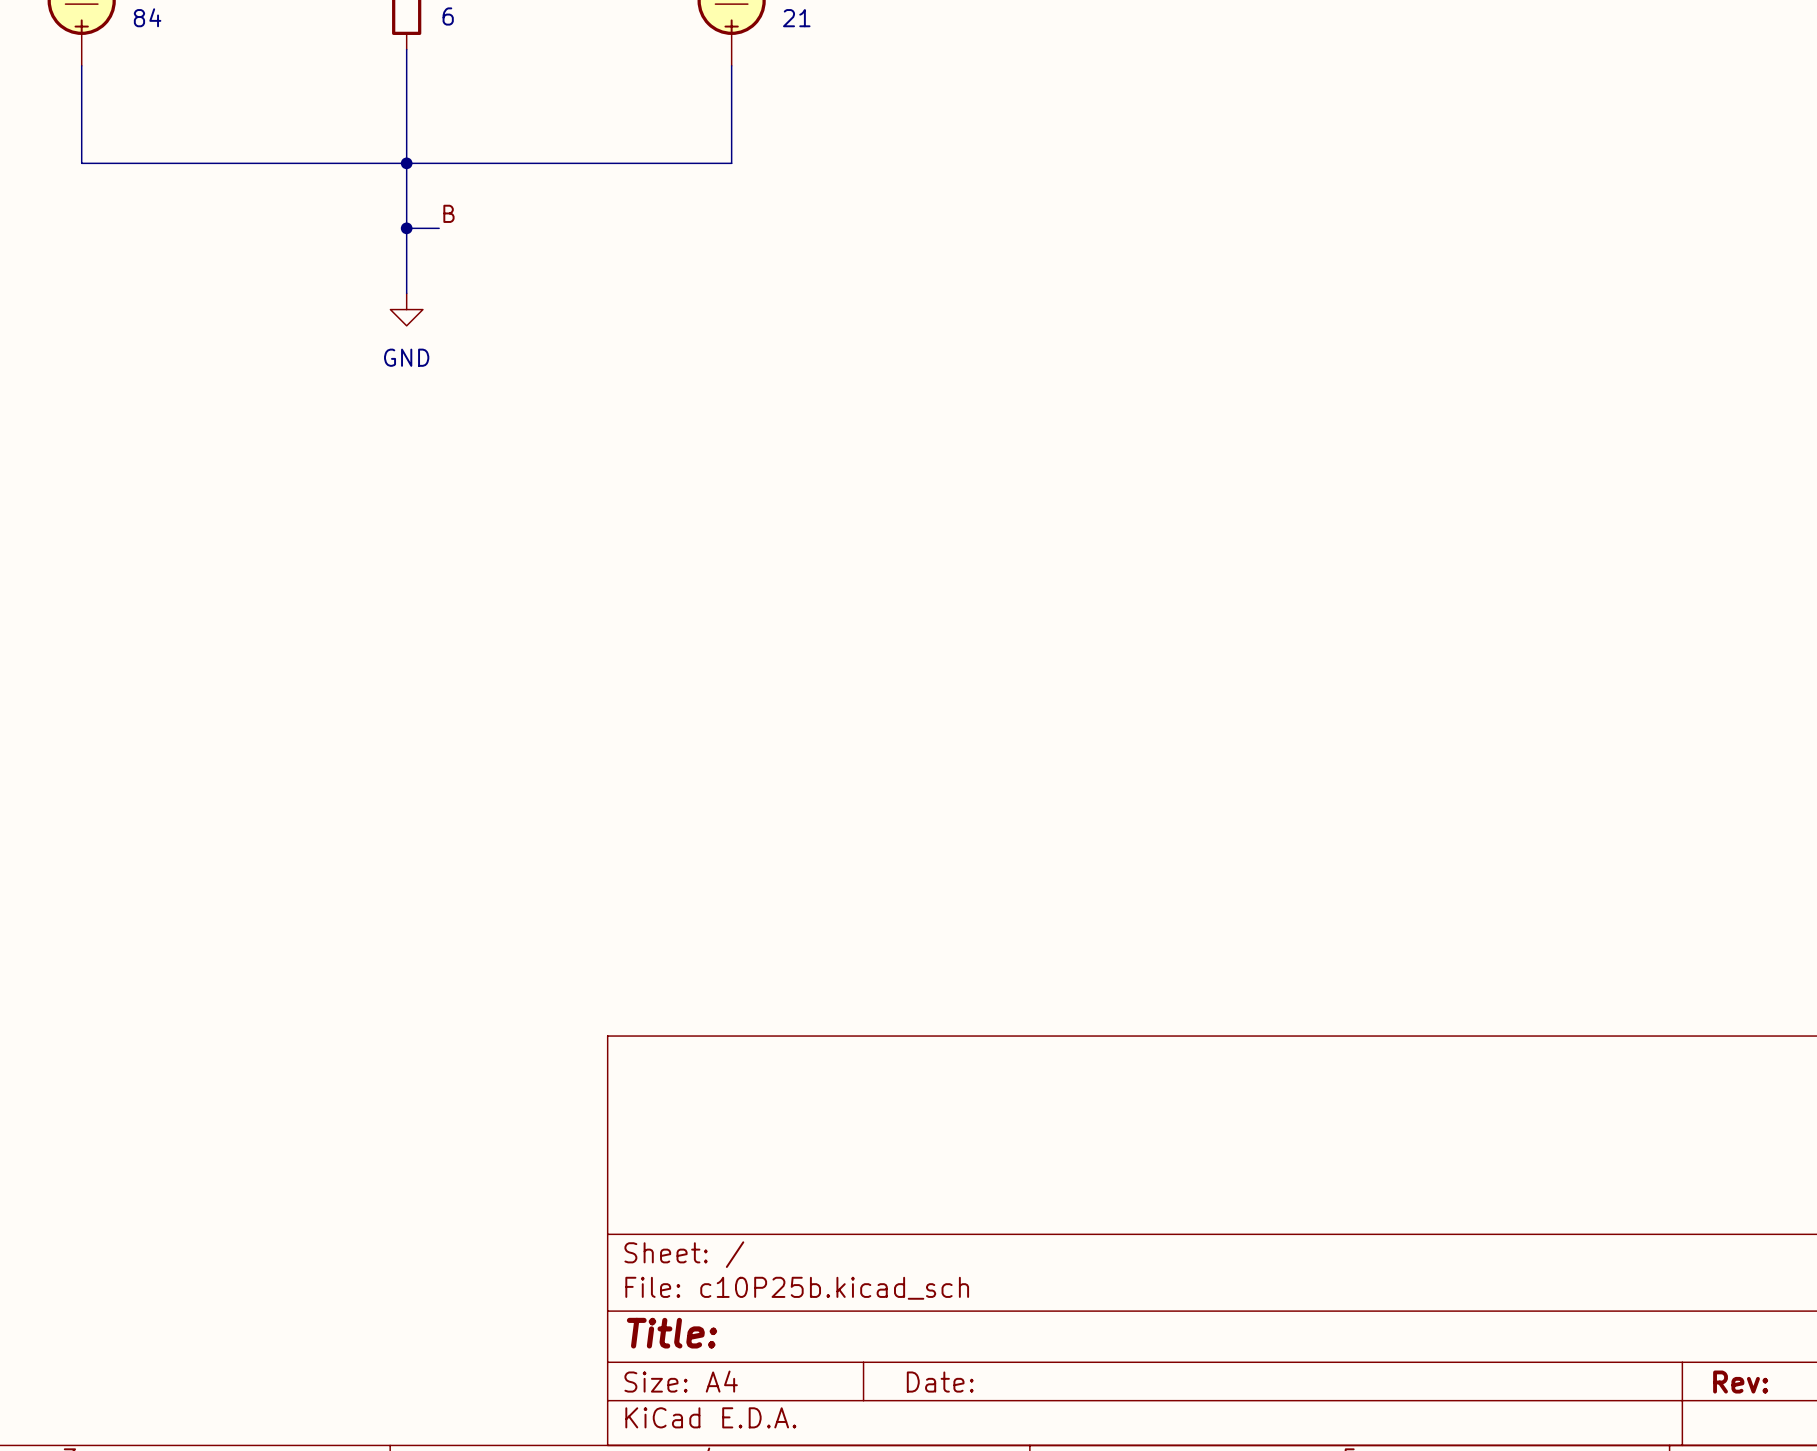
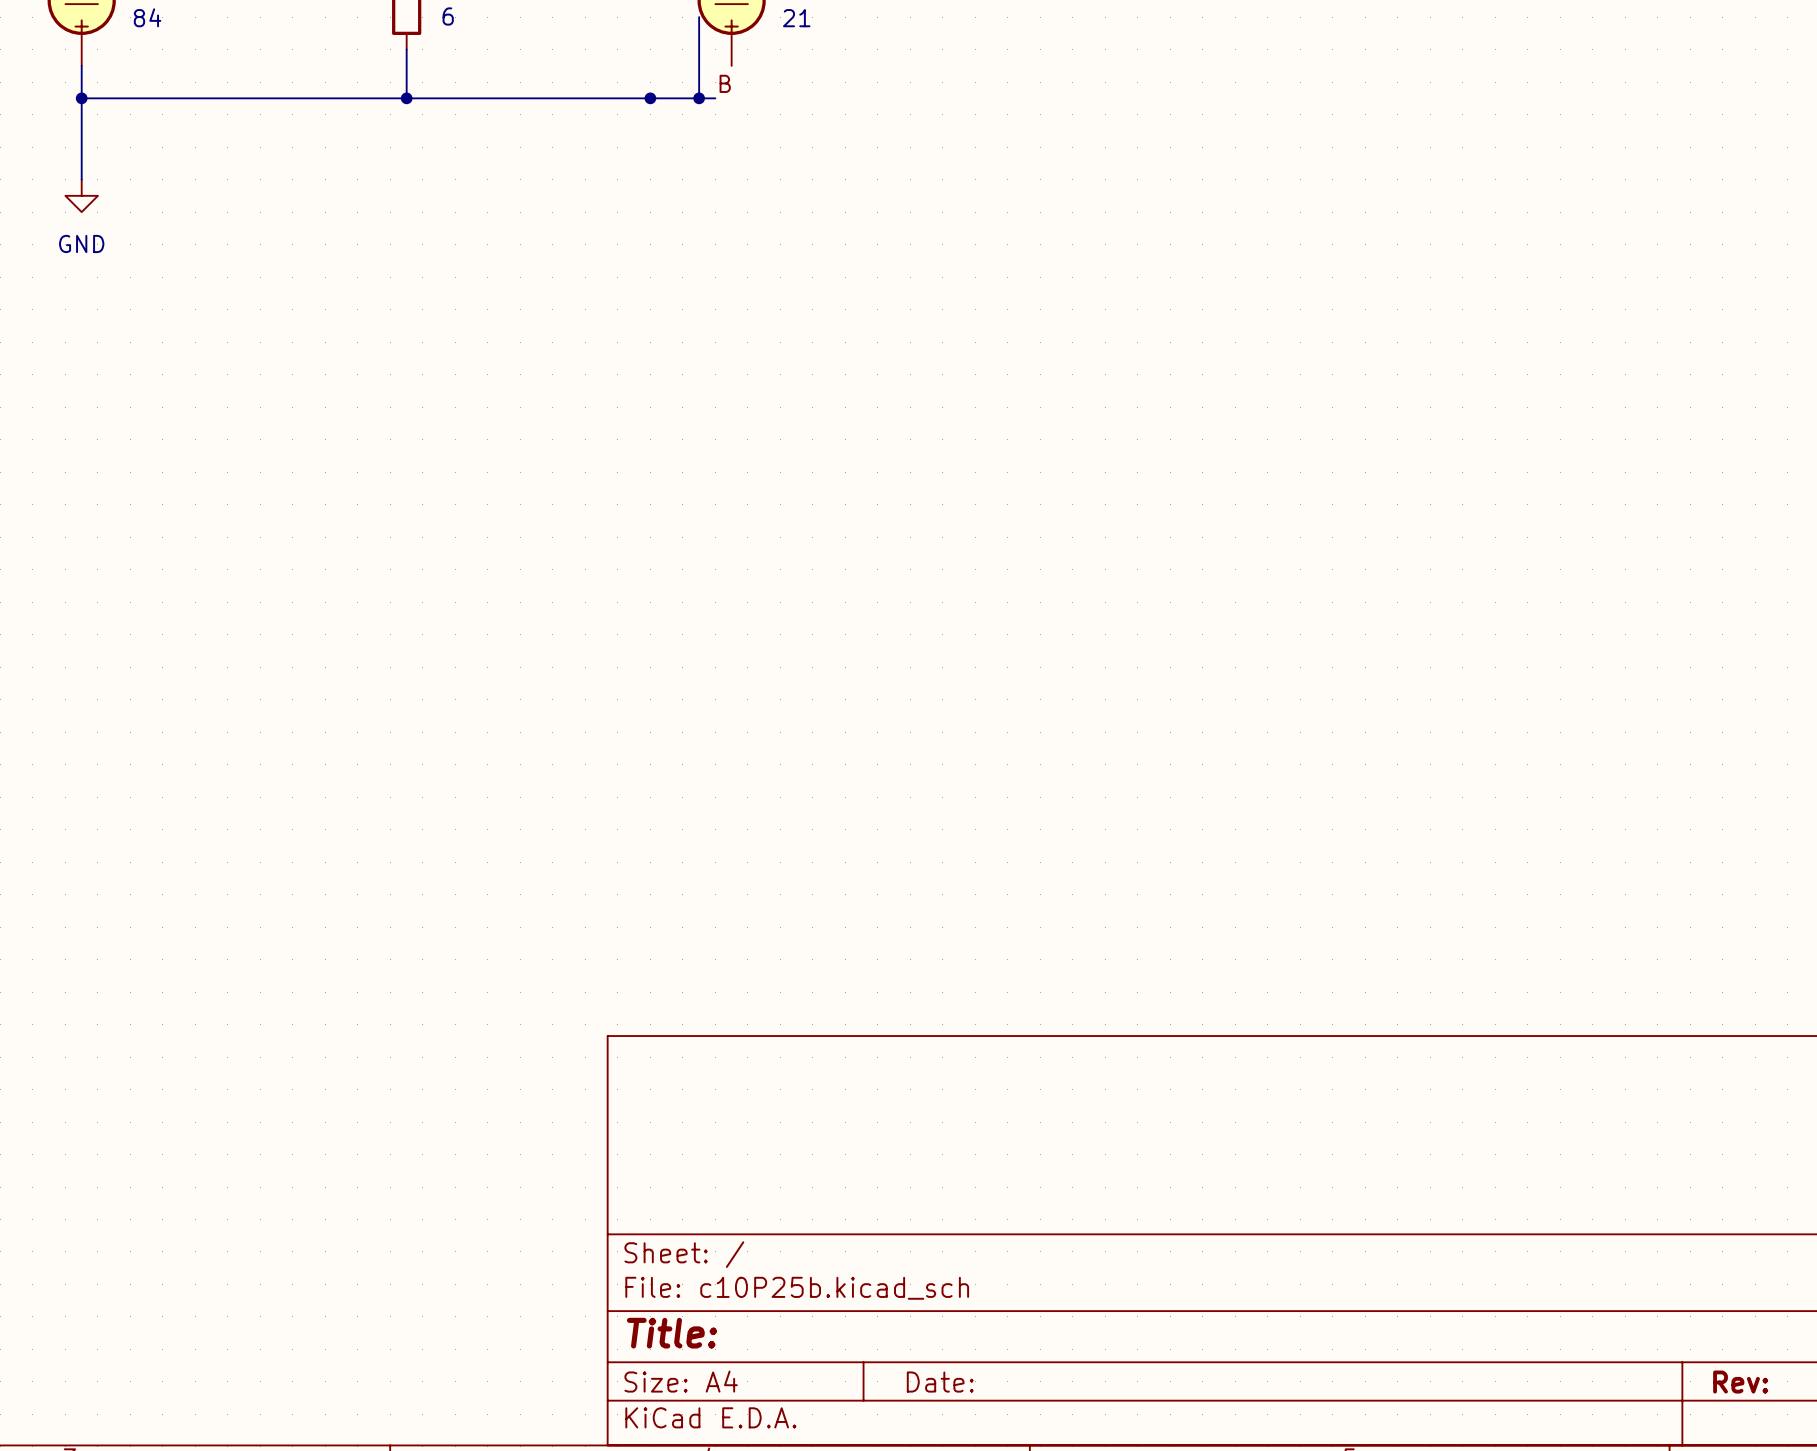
wire: none -> (699, 17) (699, 98)
wire: (731, 65) (731, 163) (81, 163) -> (81, 179) (81, 163)
wire: none -> (81, 98) (715, 98)
junction: none -> (81, 98)
wire: (406, 98) (406, 293) -> none
junction: none -> (406, 98)
junction: none -> (650, 98)
junction: none -> (699, 98)
junction: (406, 163) -> none
power symbol: none -> GND (81, 195)
label position: B (448, 213) -> B (725, 83)
wire: (406, 228) (439, 228) -> none
junction: (406, 228) -> none
power symbol: GND (406, 309) -> none

